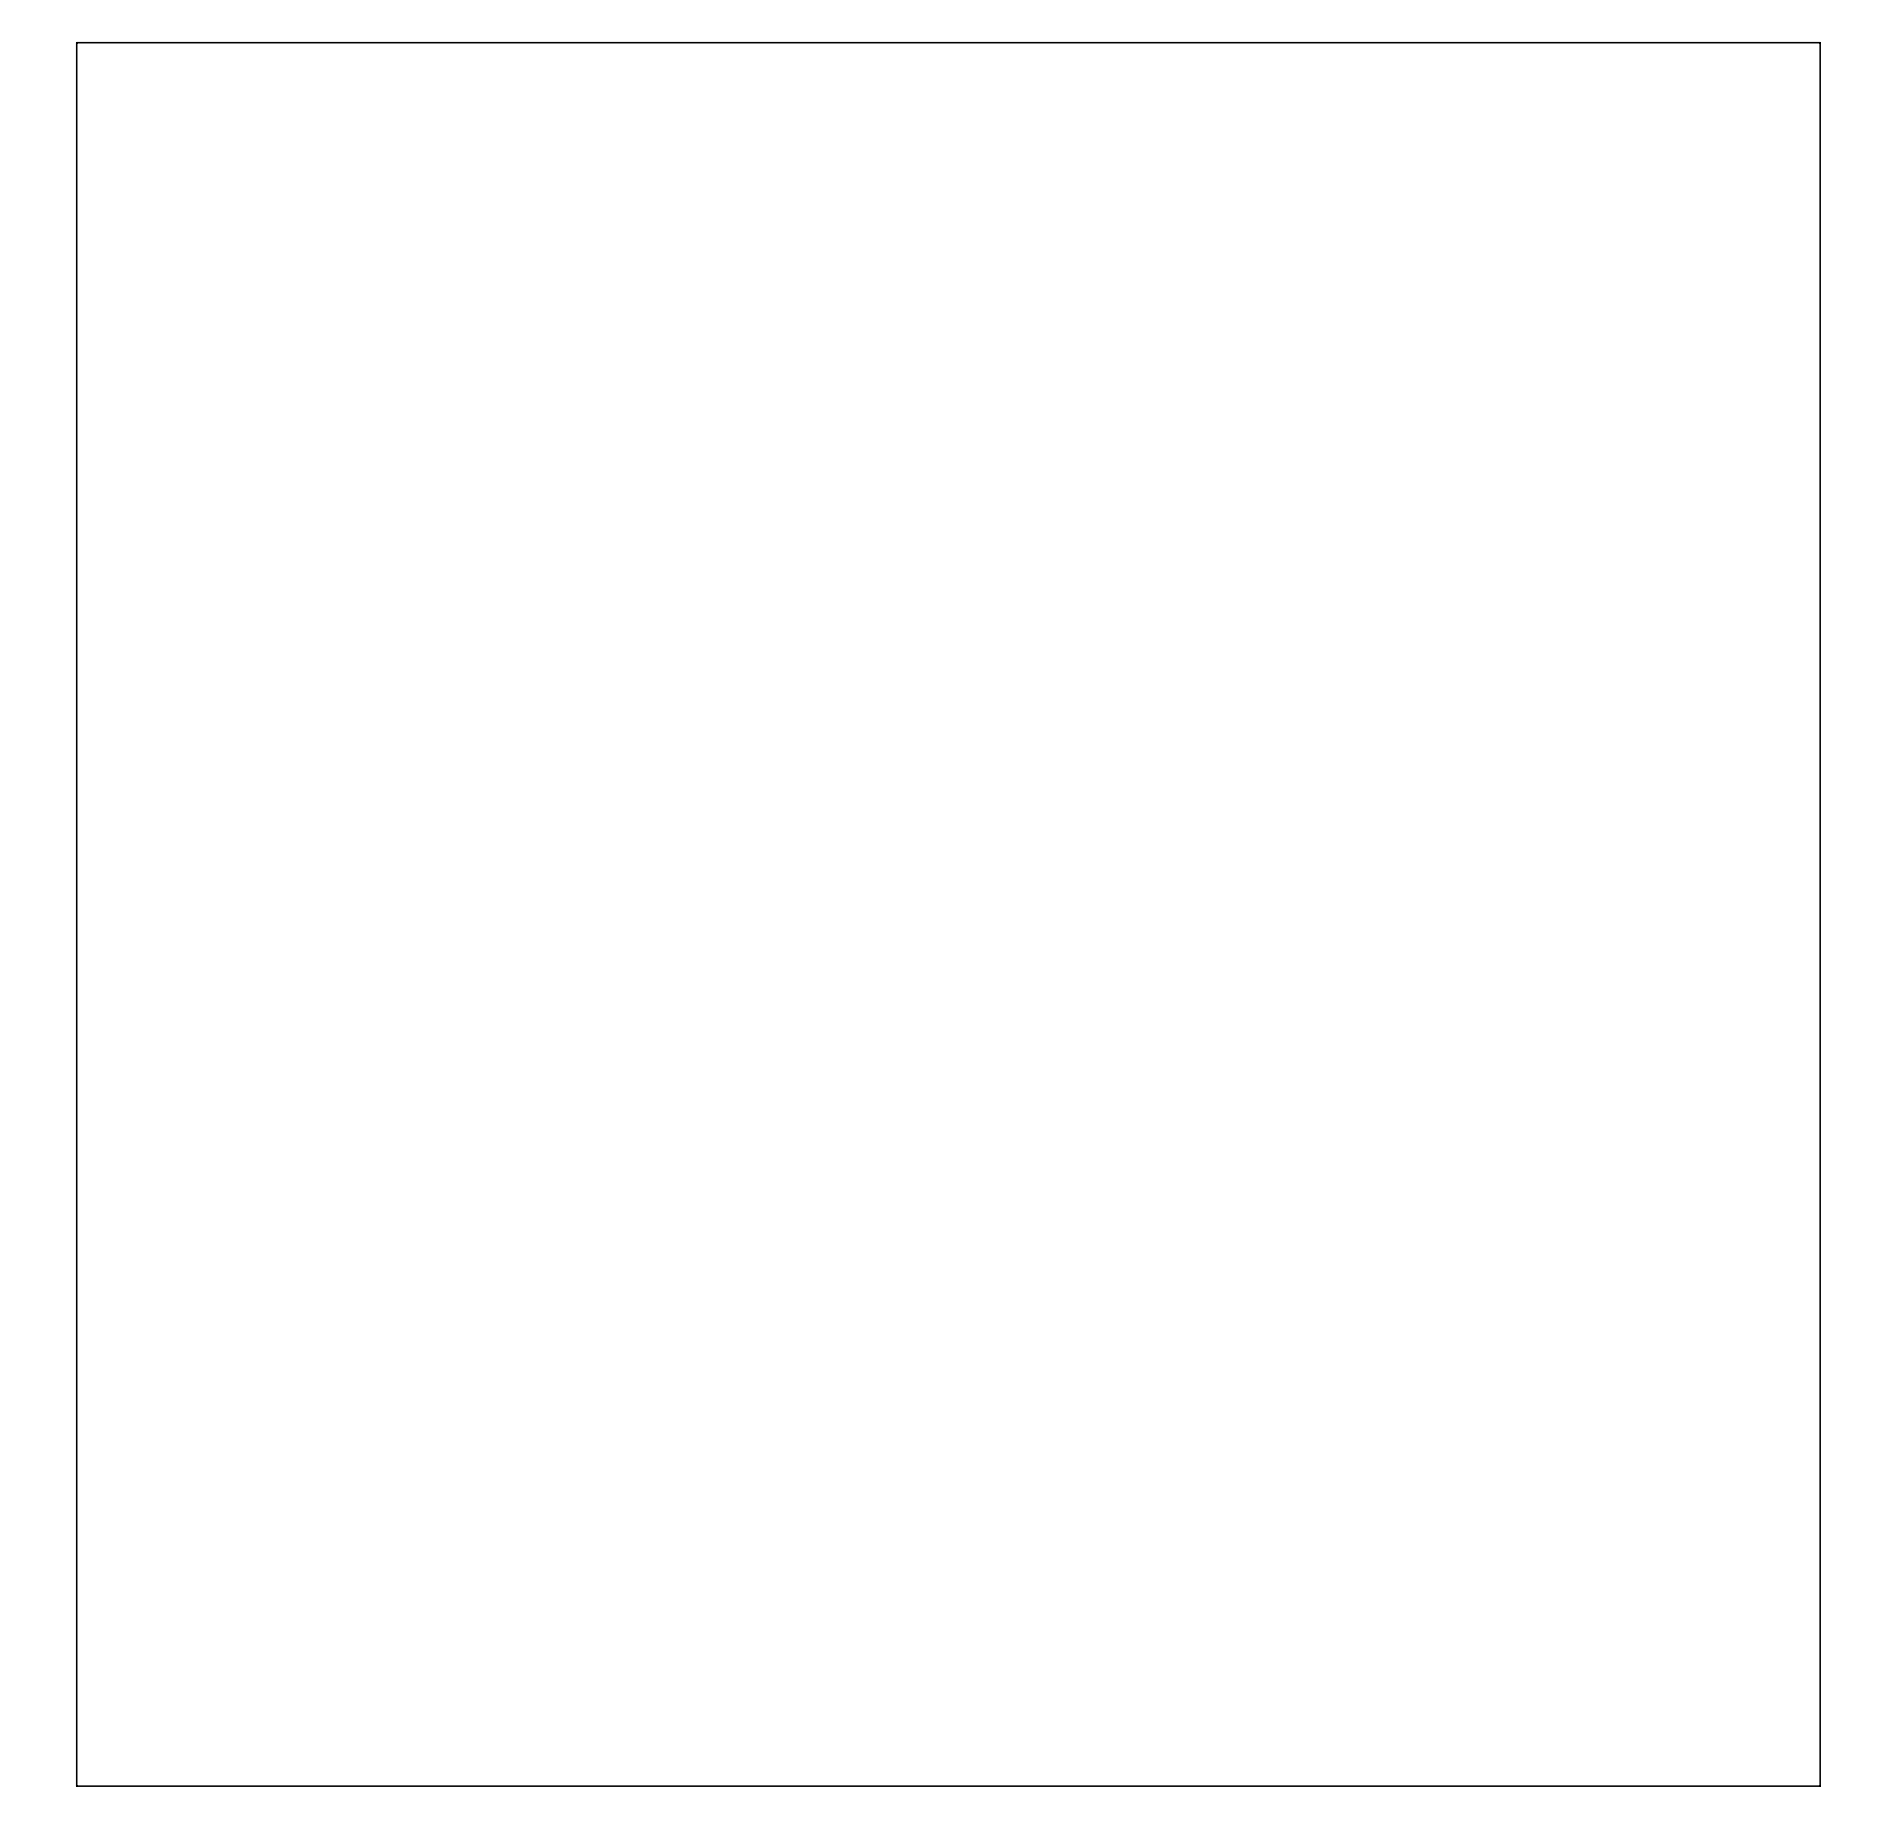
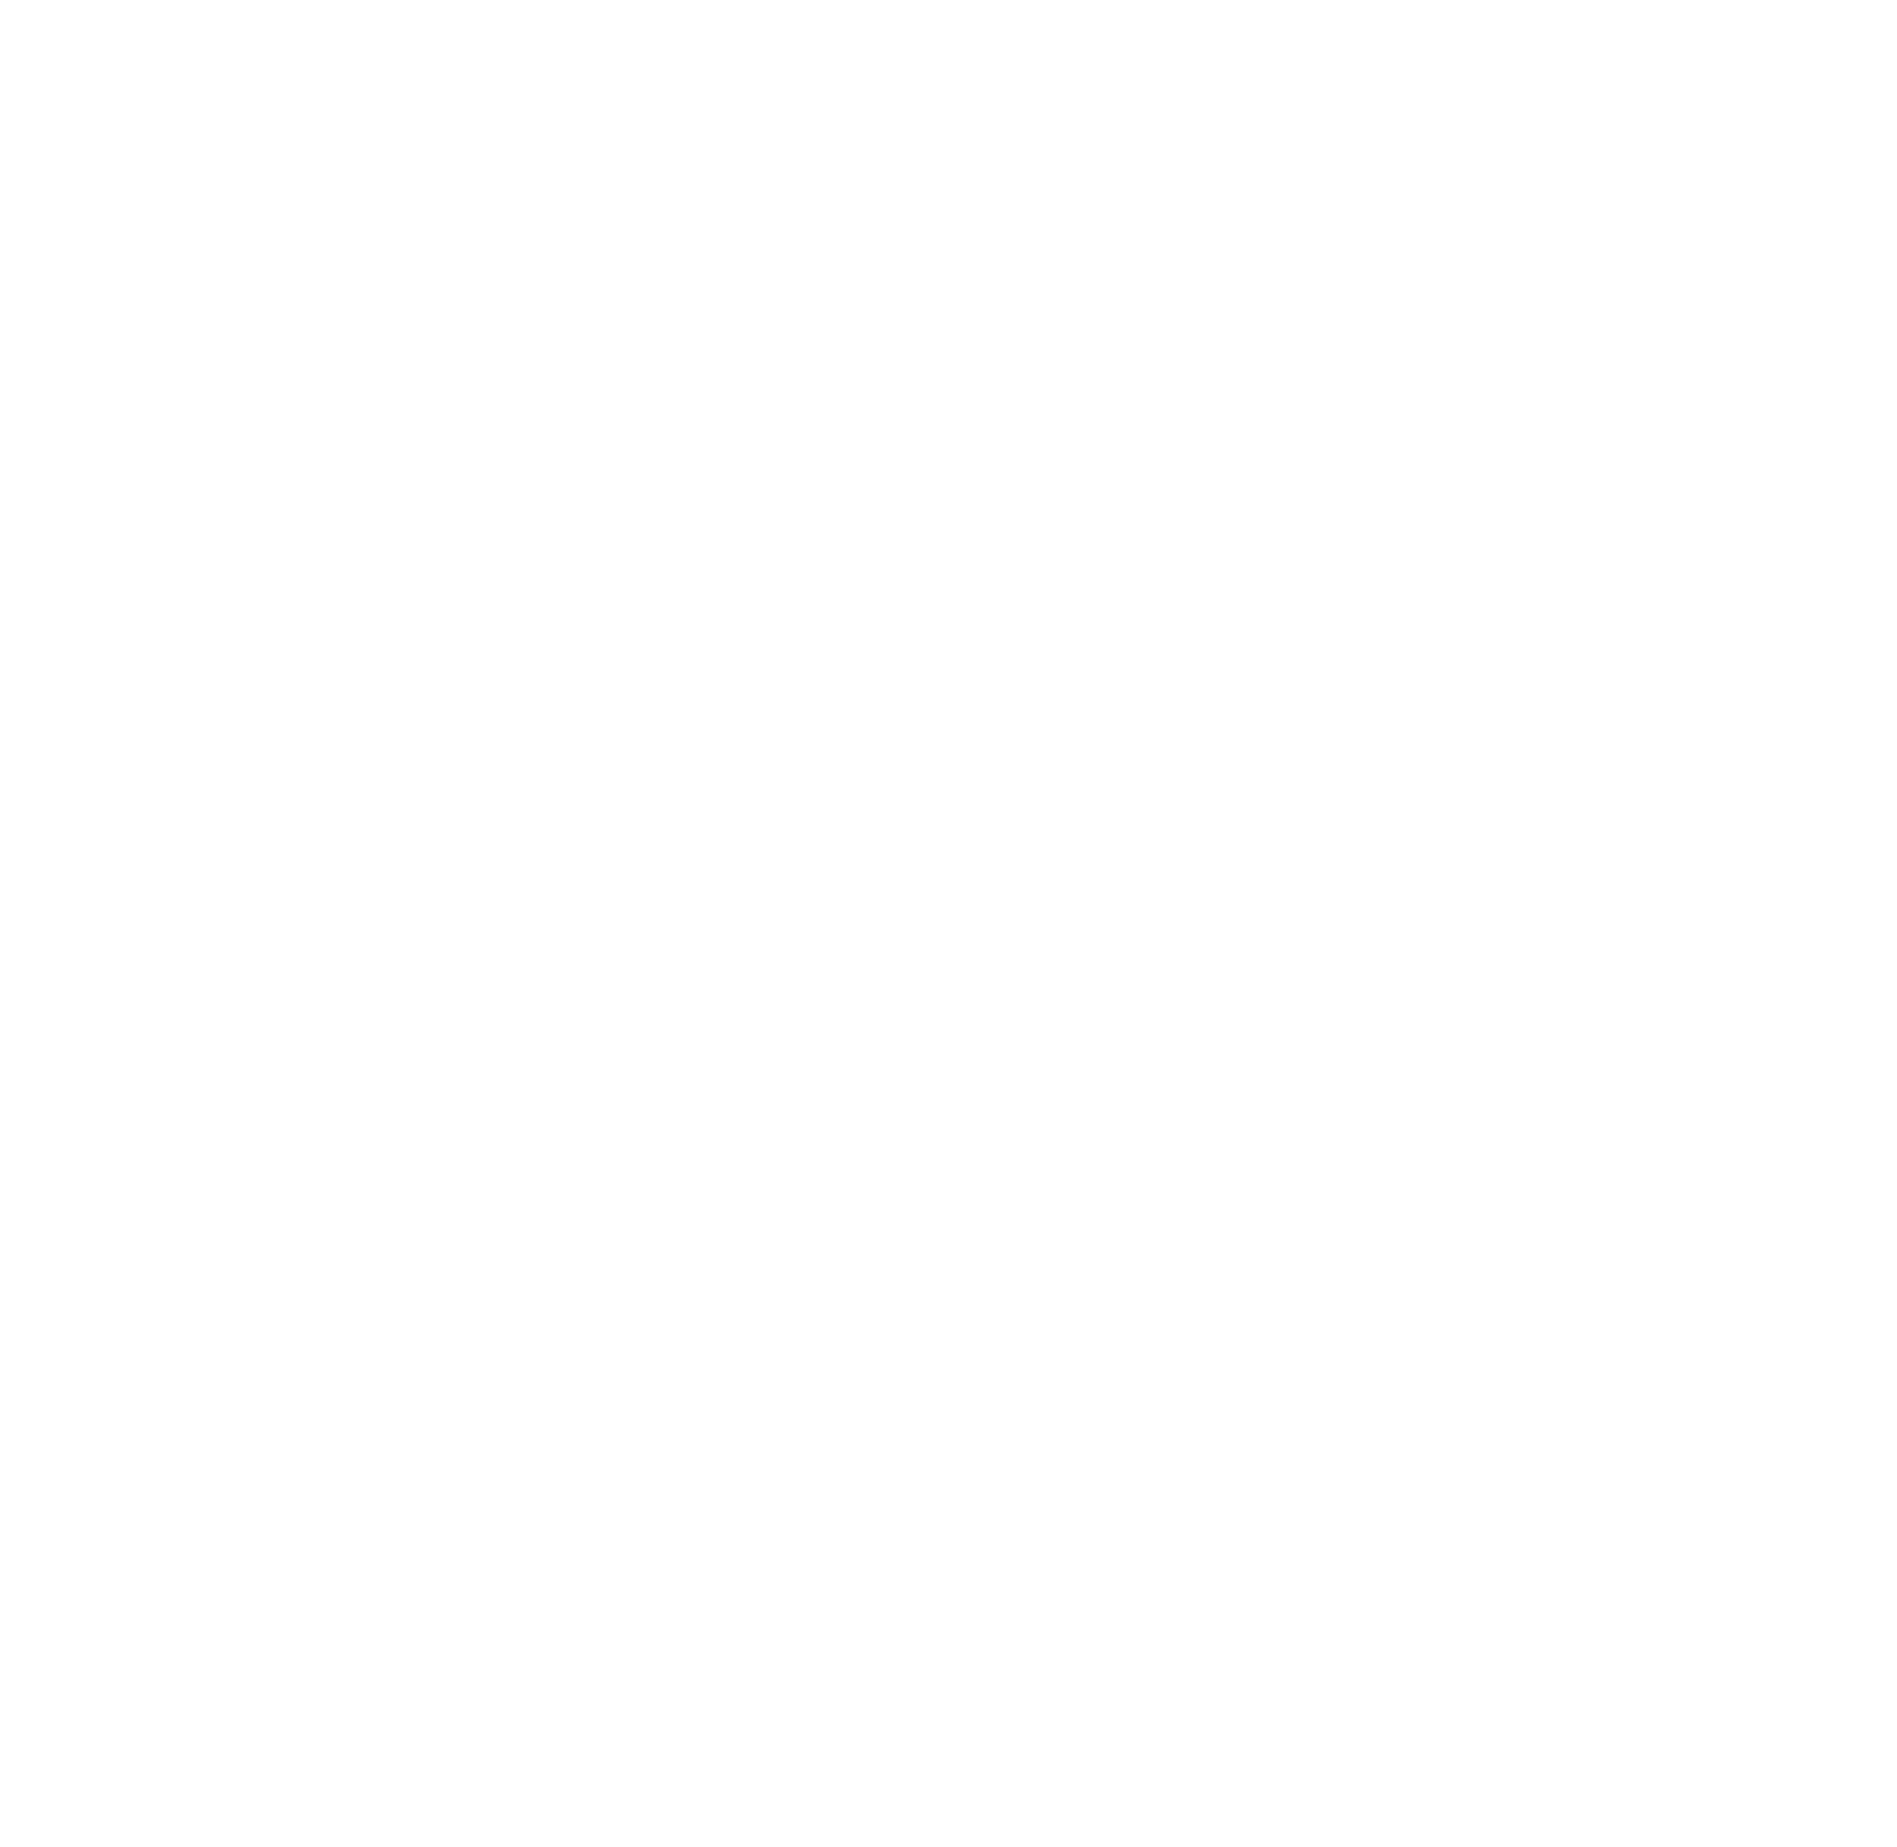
board edge: (76, 42) (1820, 42) (1820, 1786) (76, 1786) (76, 42) -> none

